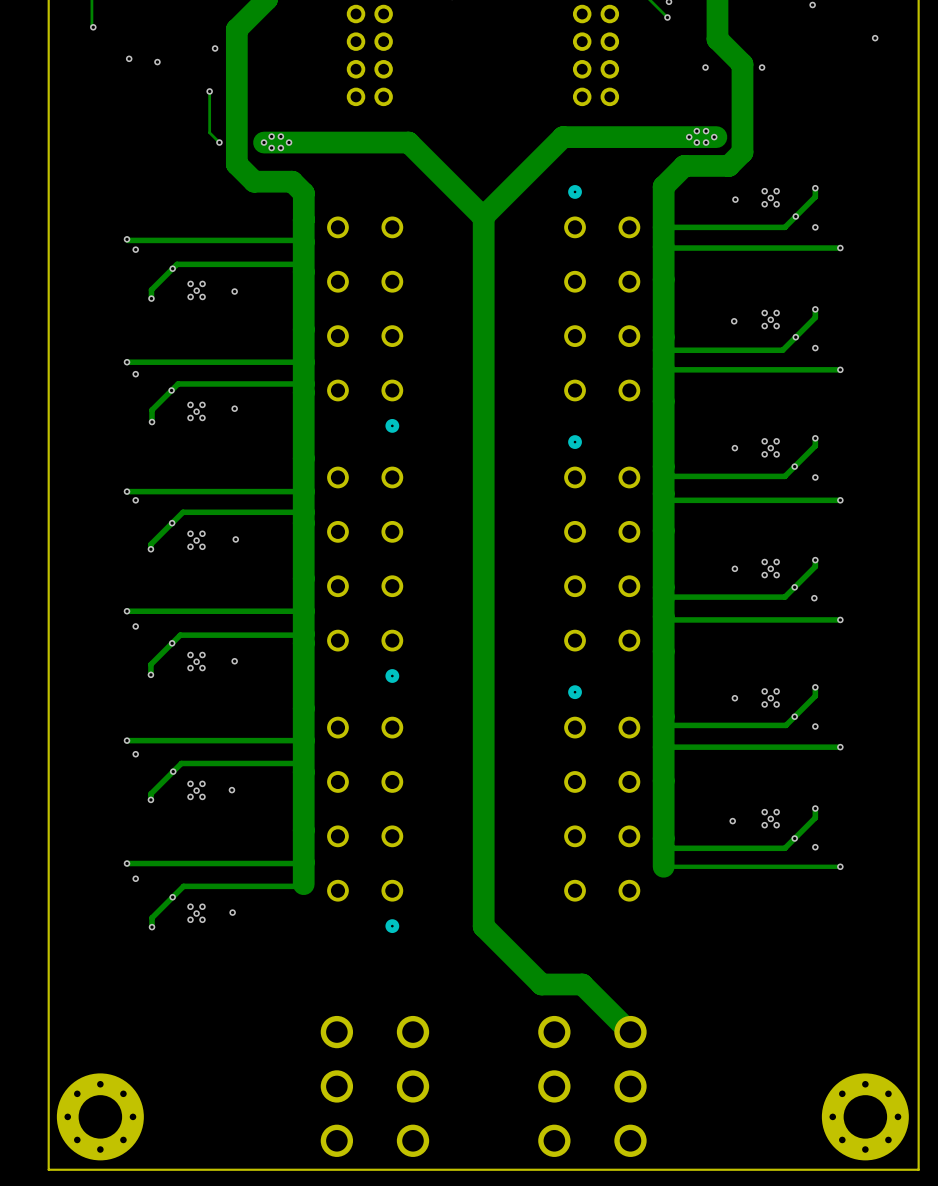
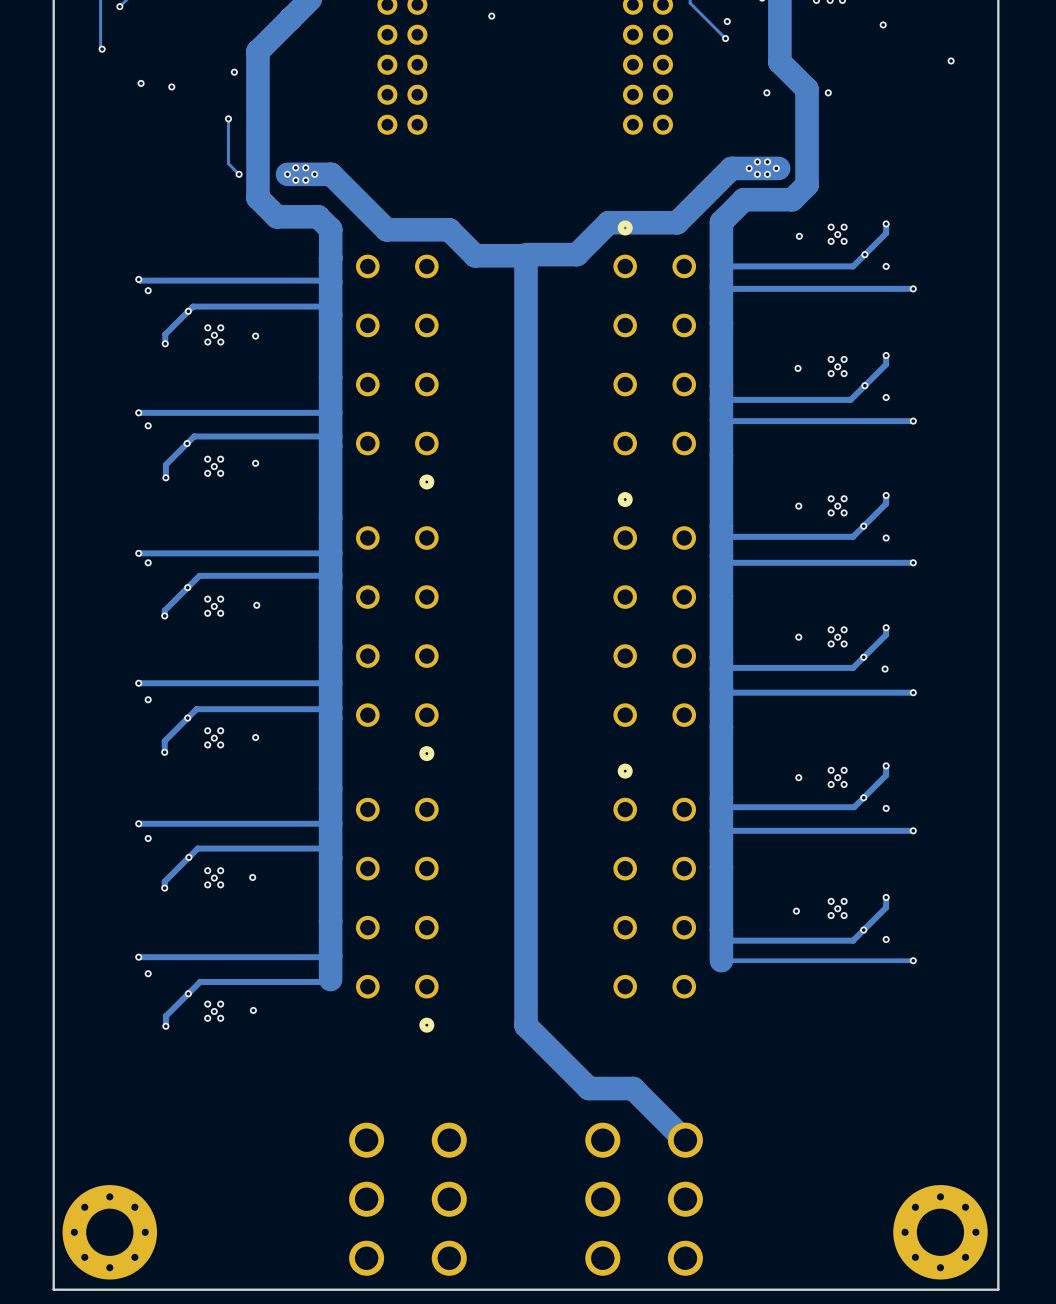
track: (672, 137) (563, 137) (483, 216) -> (731, 168) (677, 222) (608, 222) (576, 254) (526, 254)
track: (304, 142) (408, 142) (483, 217) -> (331, 174) (386, 229) (449, 229) (475, 255) (526, 255)

